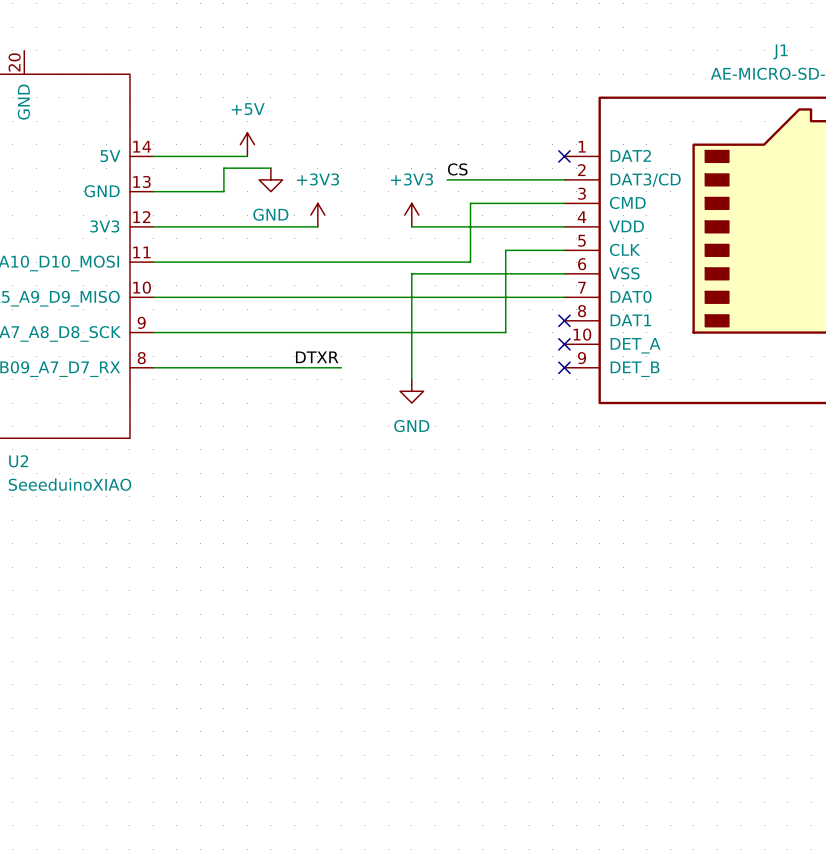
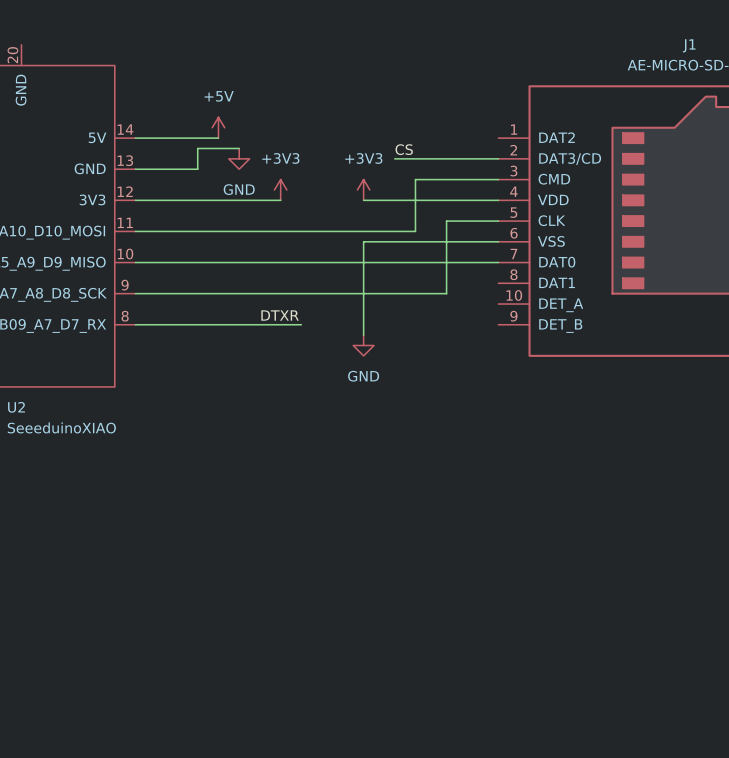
no-connect mark: (564, 156) -> none
no-connect mark: (564, 320) -> none
no-connect mark: (564, 344) -> none
no-connect mark: (564, 367) -> none

